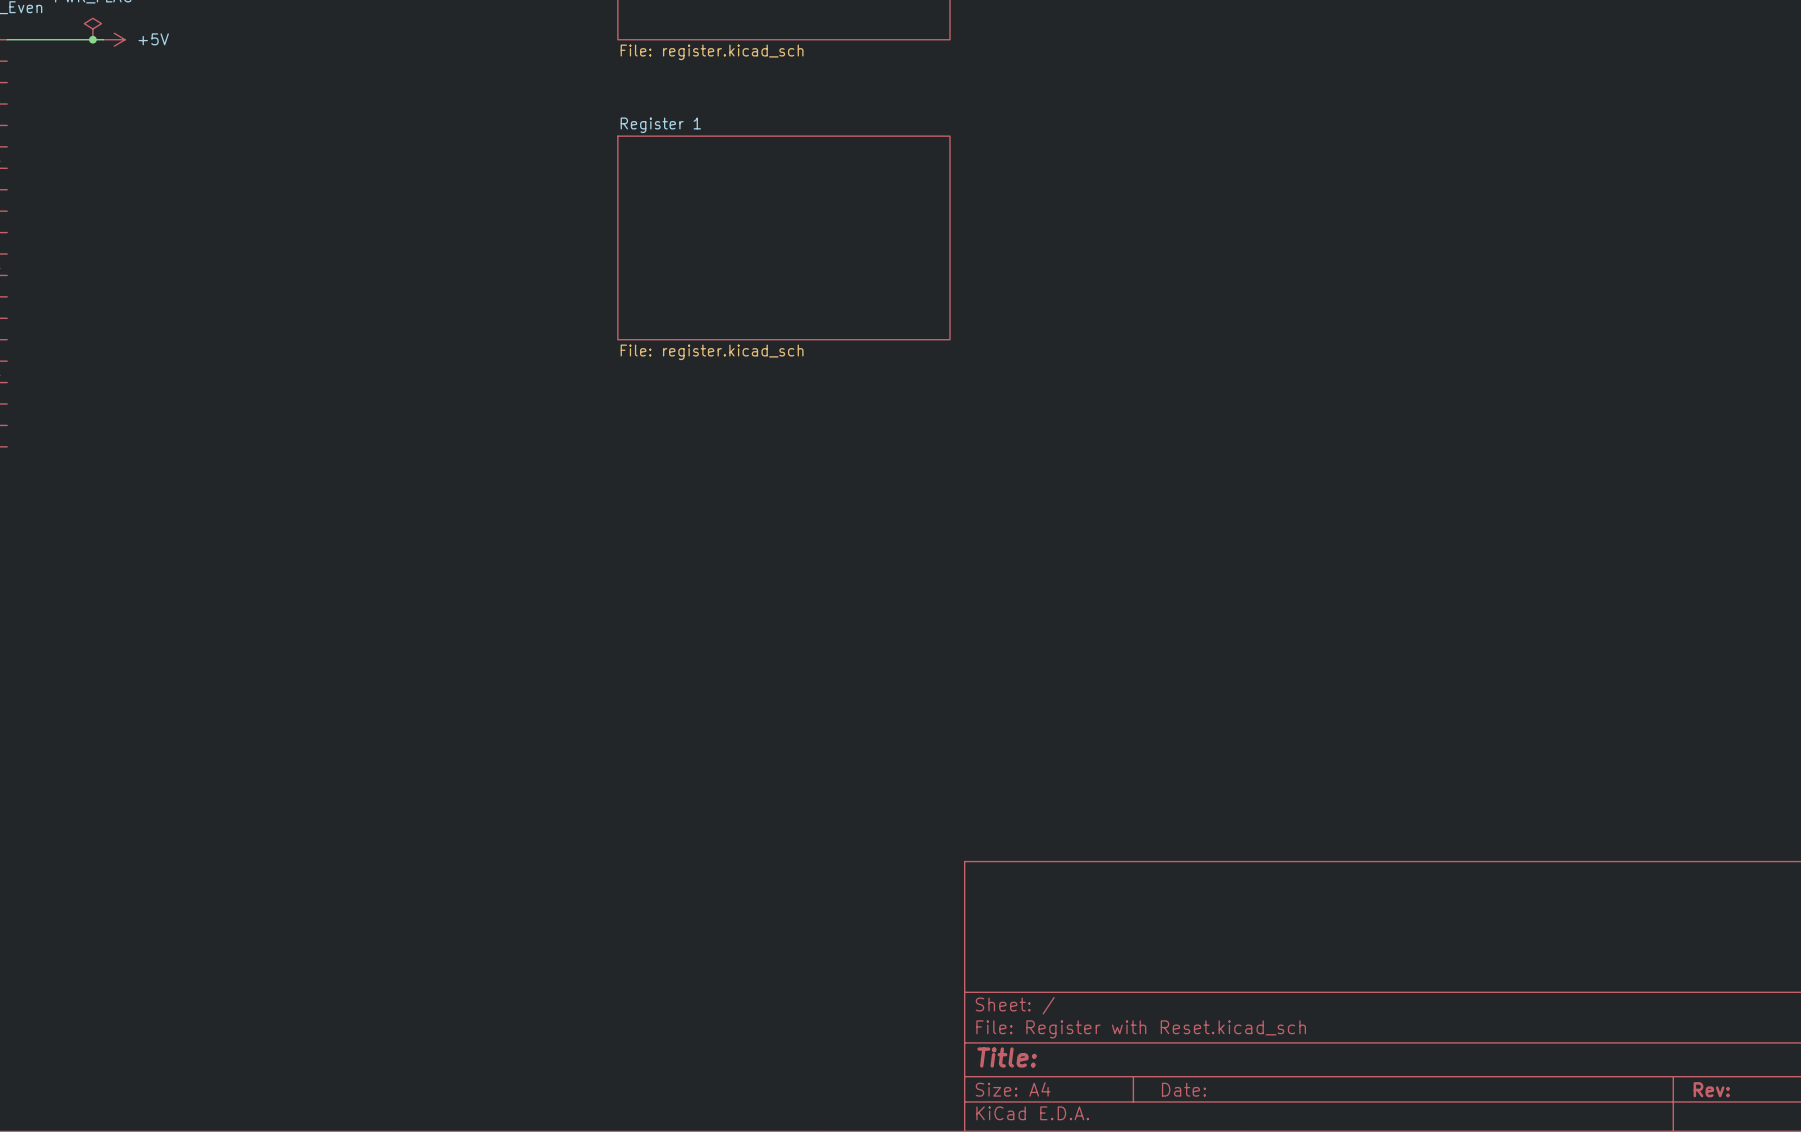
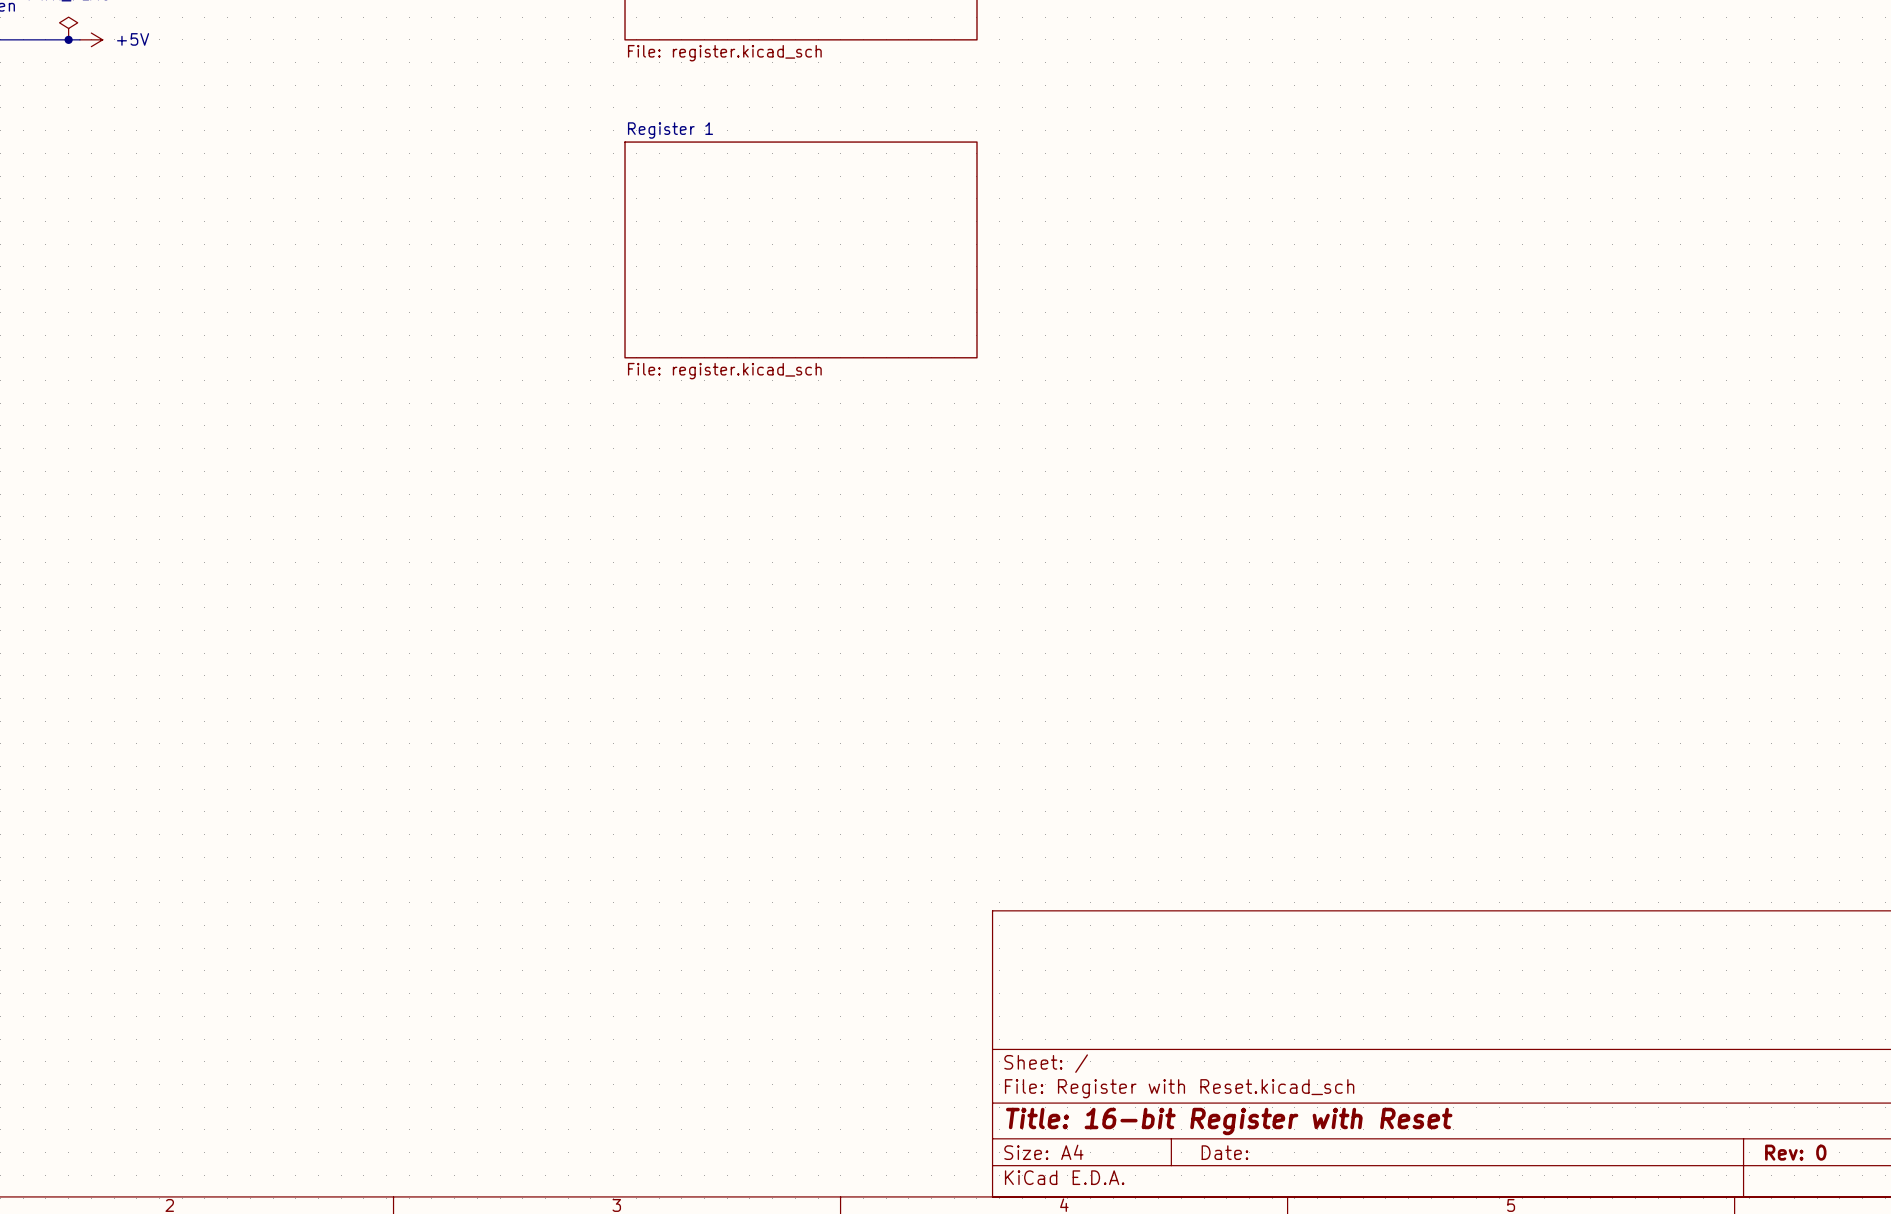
title block: Title: (1007, 1057) -> Title: 16-bit Register with Reset (1229, 1121)
title block: Rev: (1711, 1089) -> Rev: 0 (1795, 1152)

